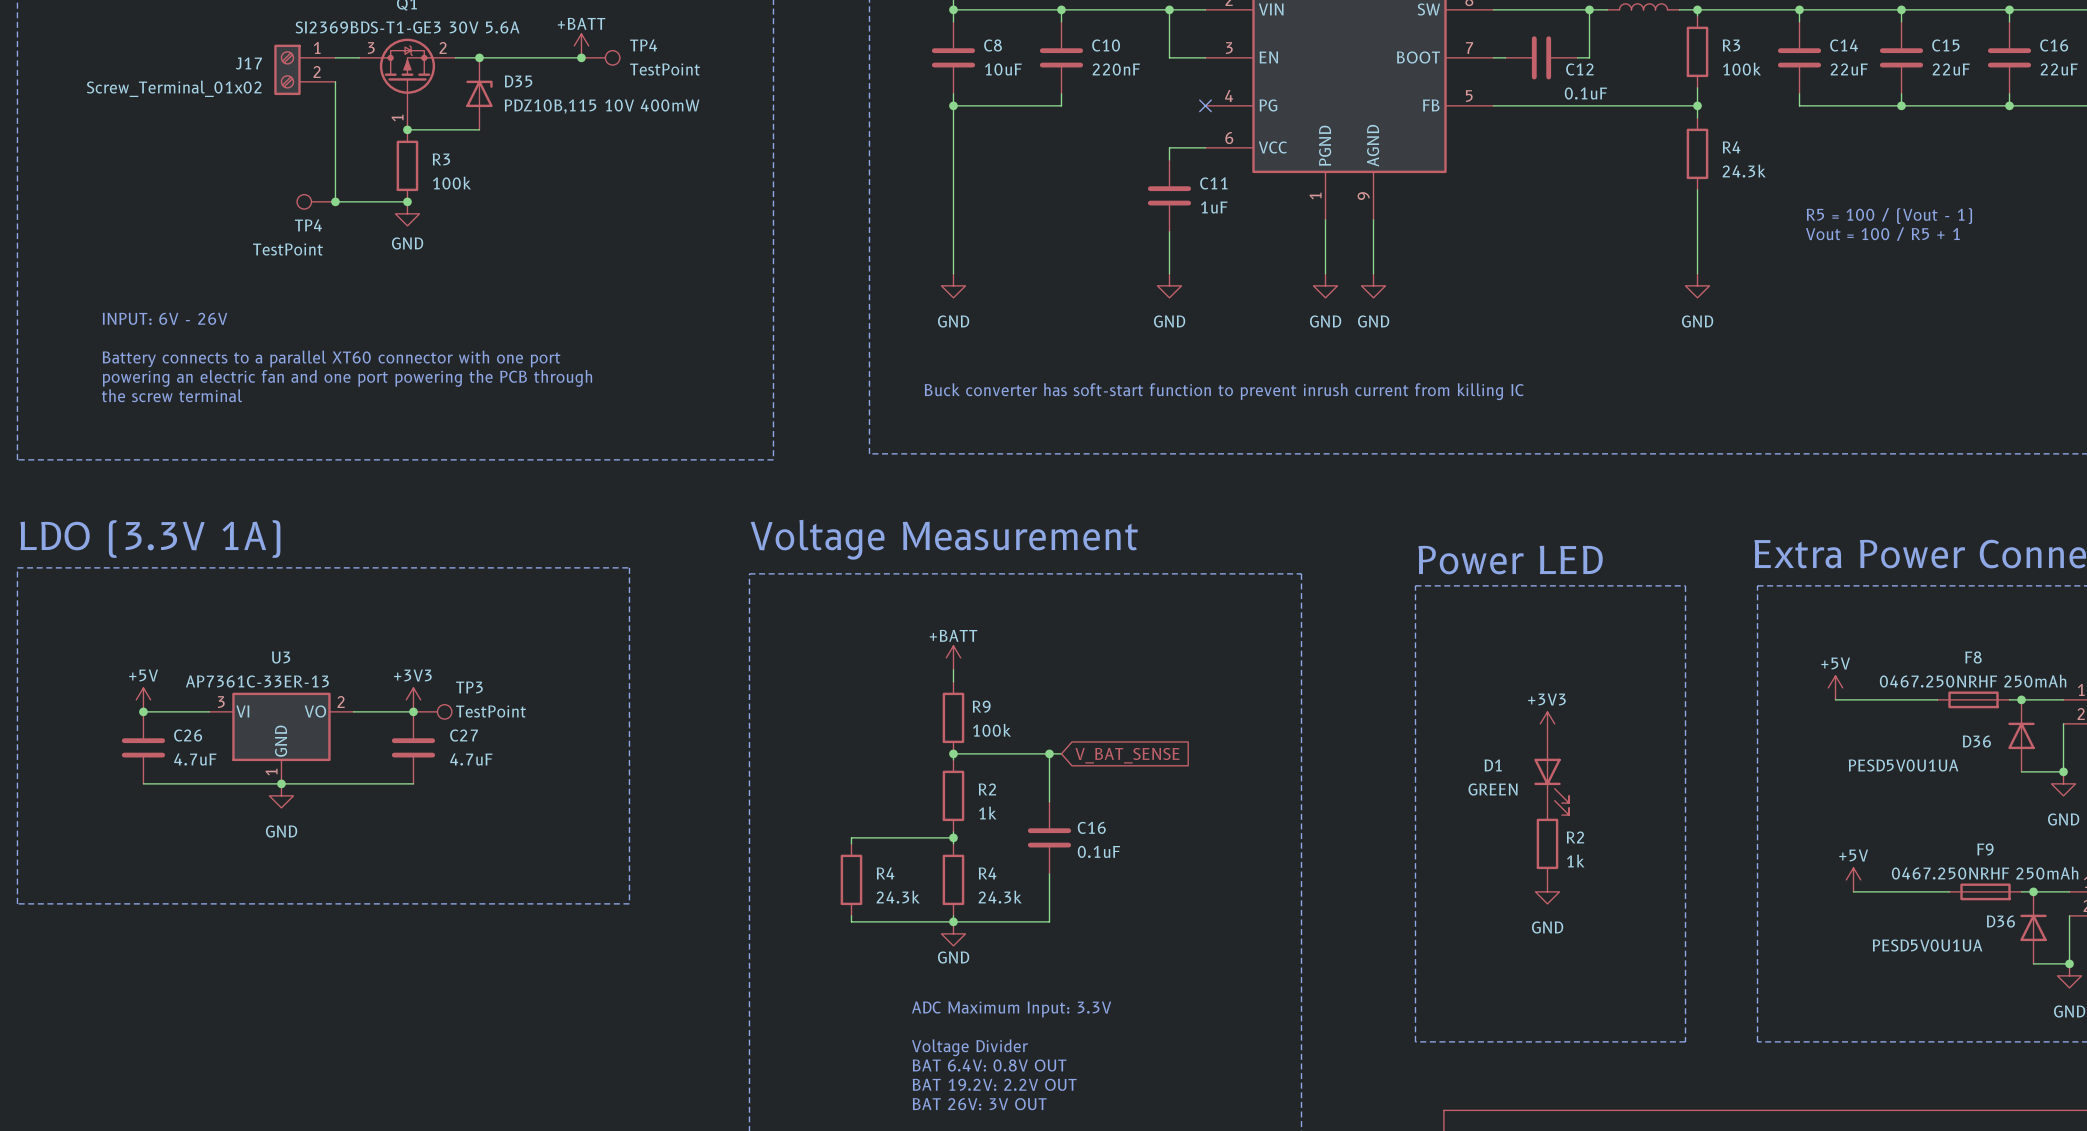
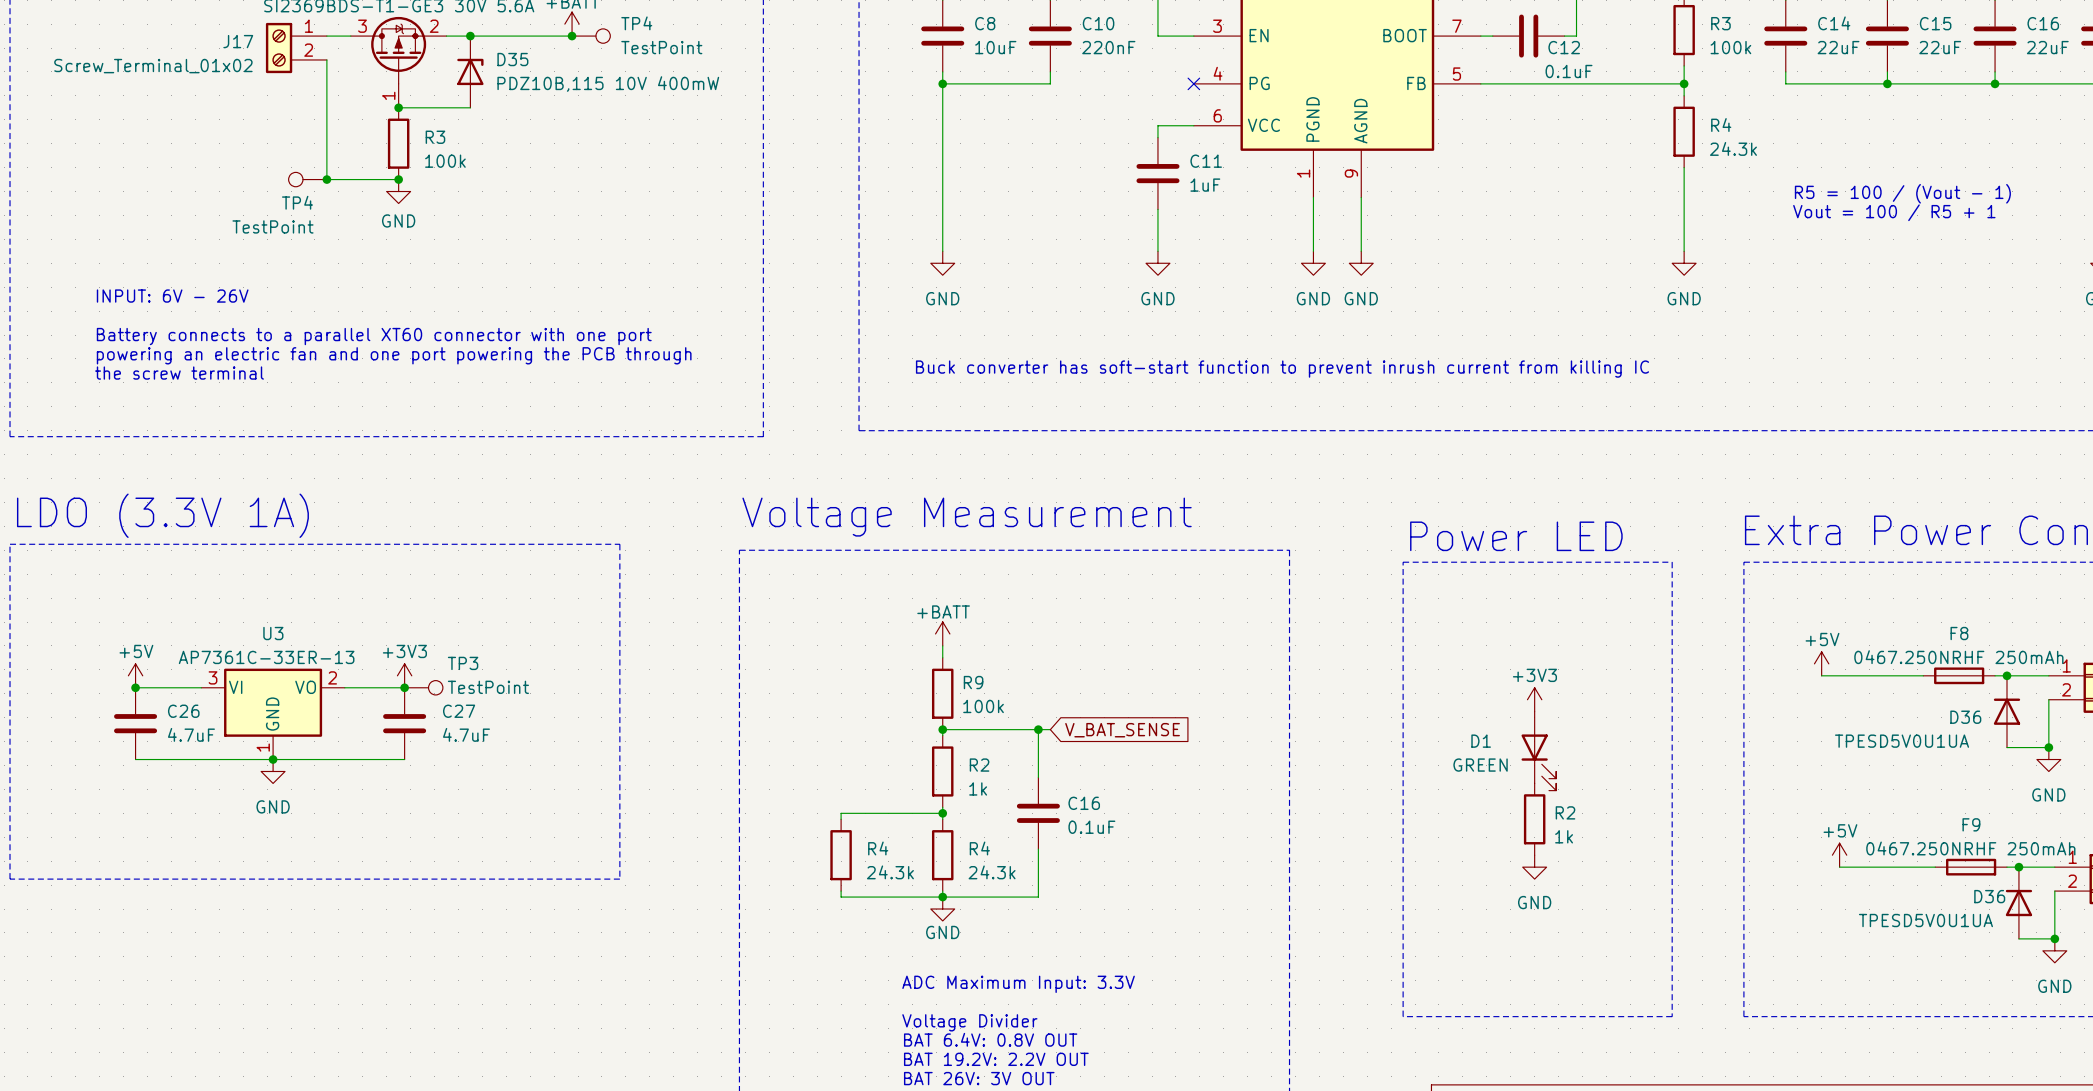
D36 value: PESD5V0U1UA (1903, 765) -> TPESD5V0U1UA (1902, 741)
D36 value: PESD5V0U1UA (1927, 945) -> TPESD5V0U1UA (1925, 920)

